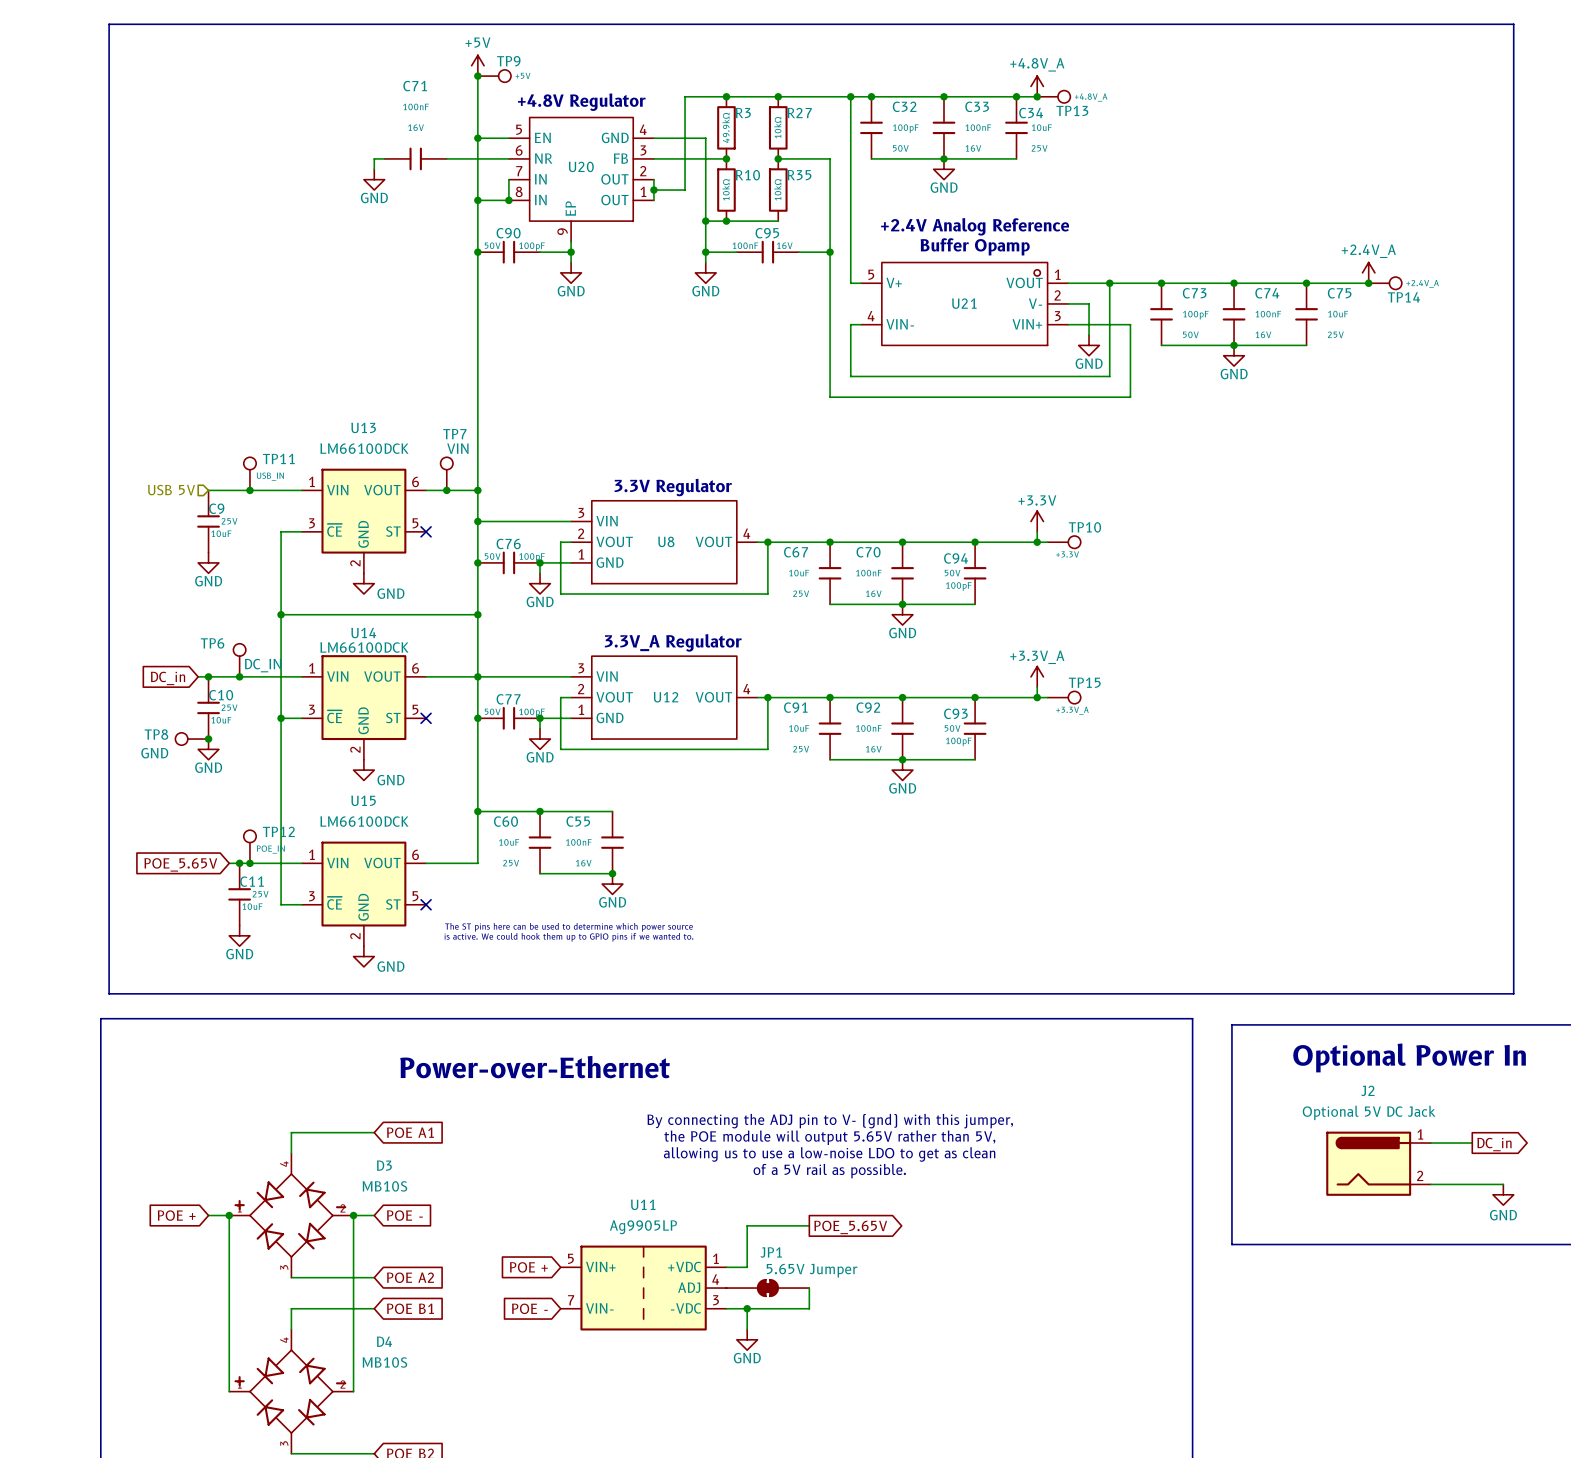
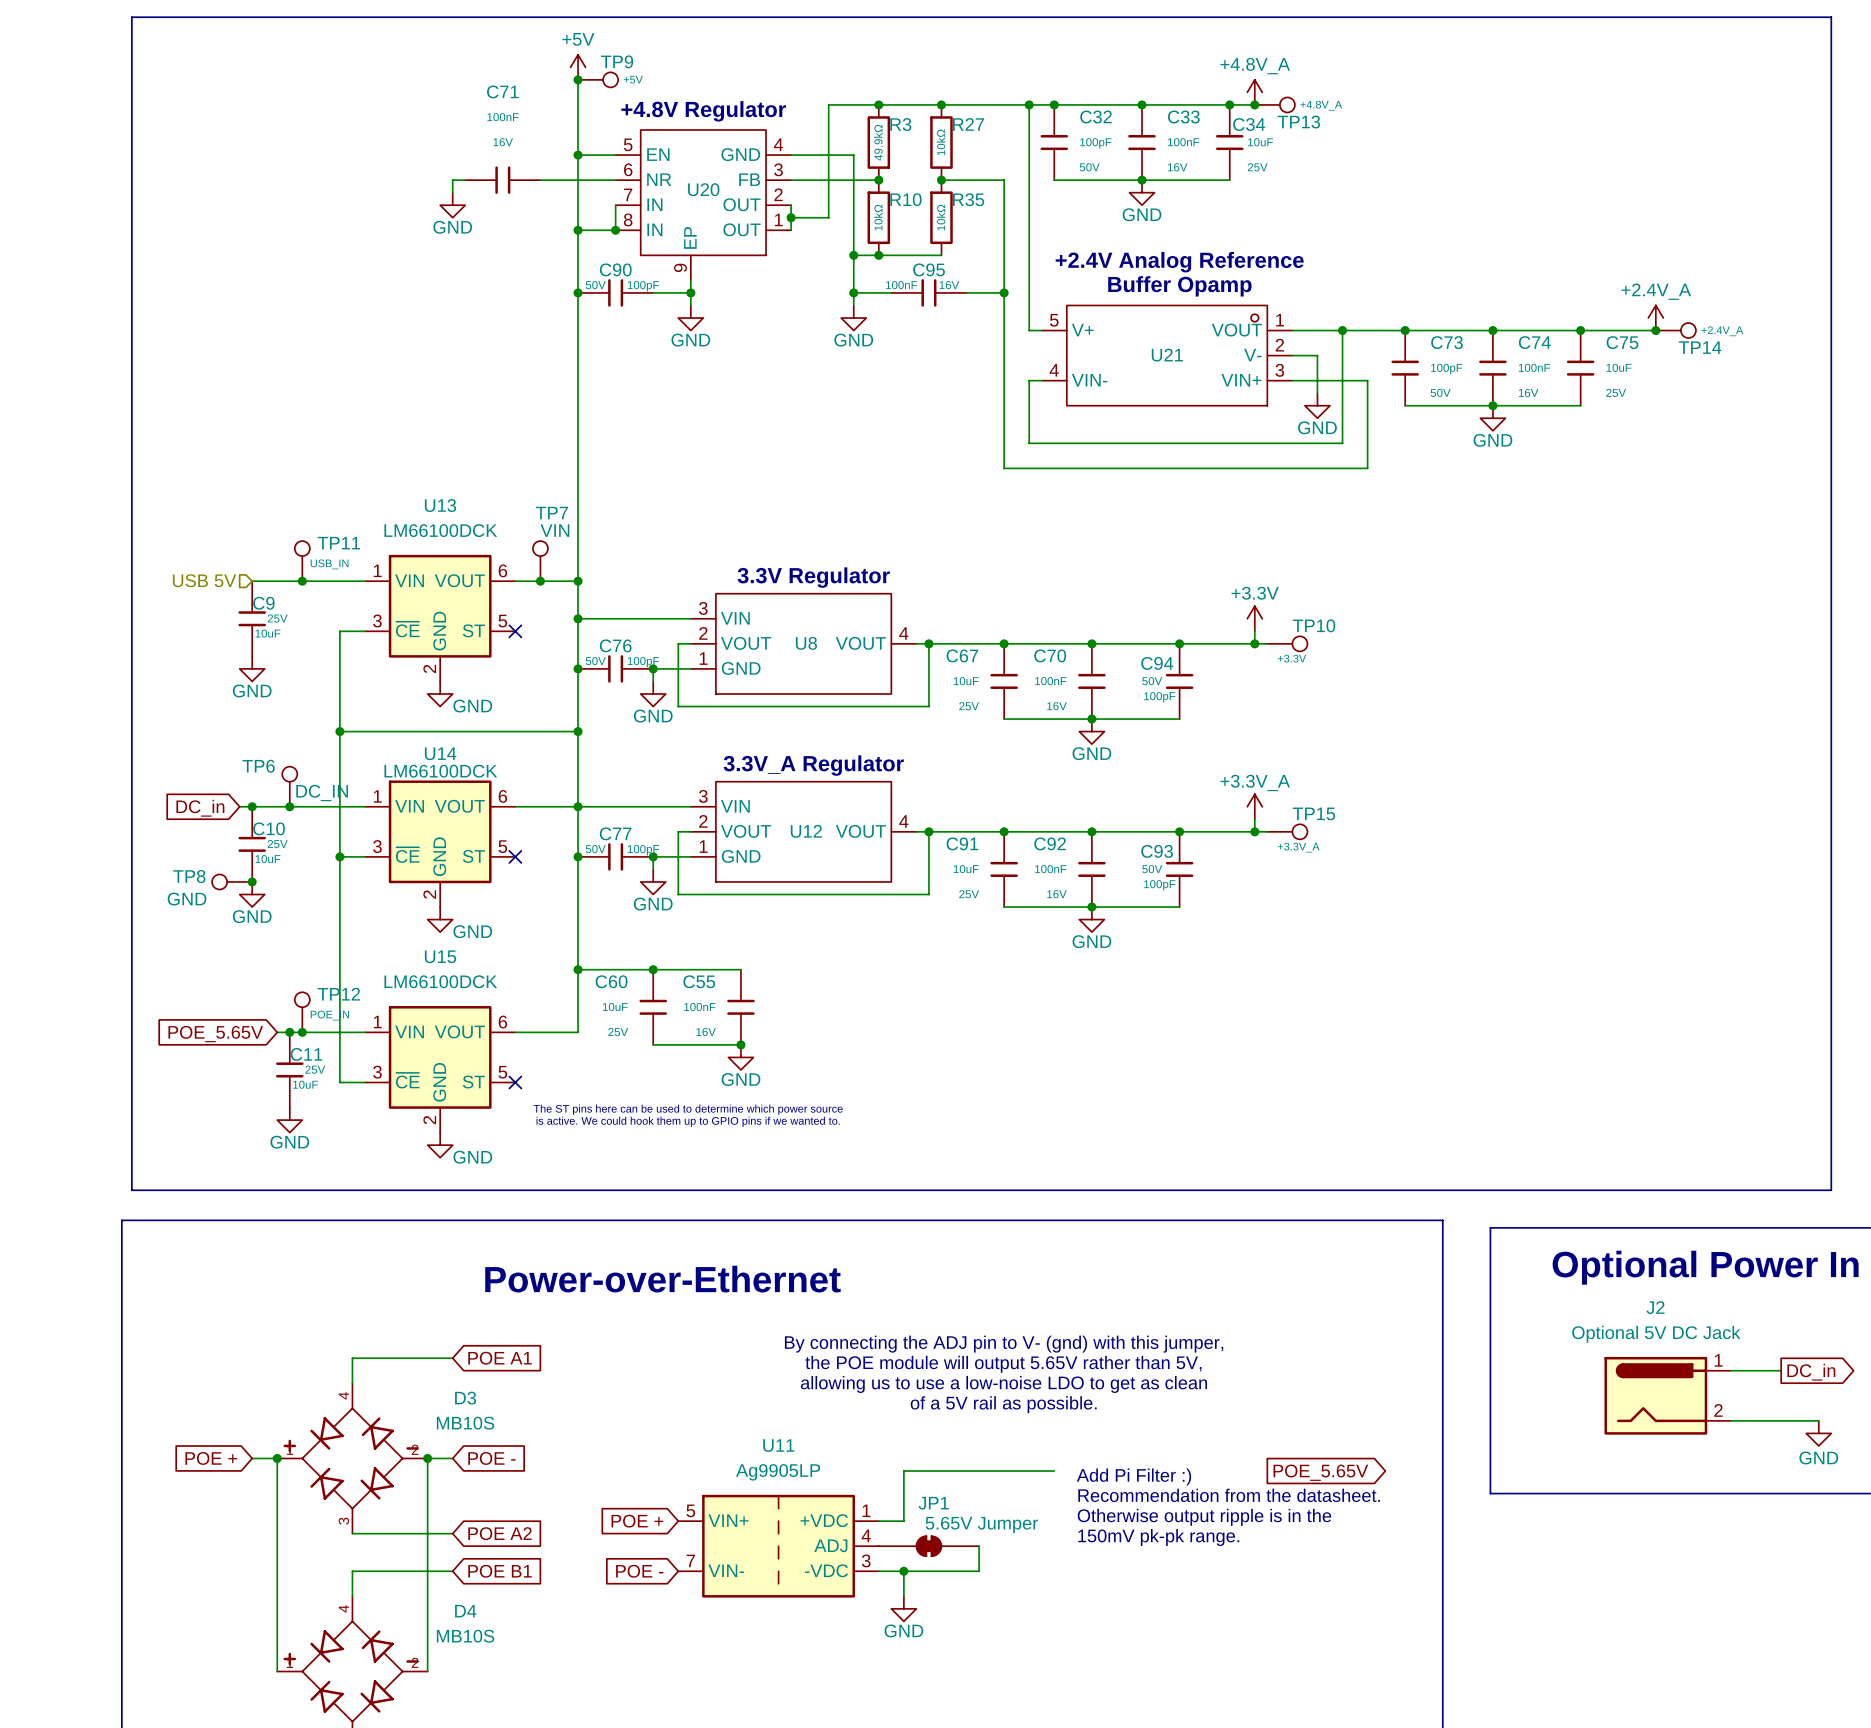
wire: none -> (979, 1471) (1054, 1471)
global label: POE_5.65V (850, 1227) -> none
global label: none -> POE_5.65V (1320, 1472)
text: none -> Add Pi Filter :) (1133, 1476)
text: none -> Recommendation from the datasheet. (1229, 1495)
text: none -> Otherwise output ripple is in the (1204, 1517)
text: none -> 150mV pk-pk range. (1158, 1537)

